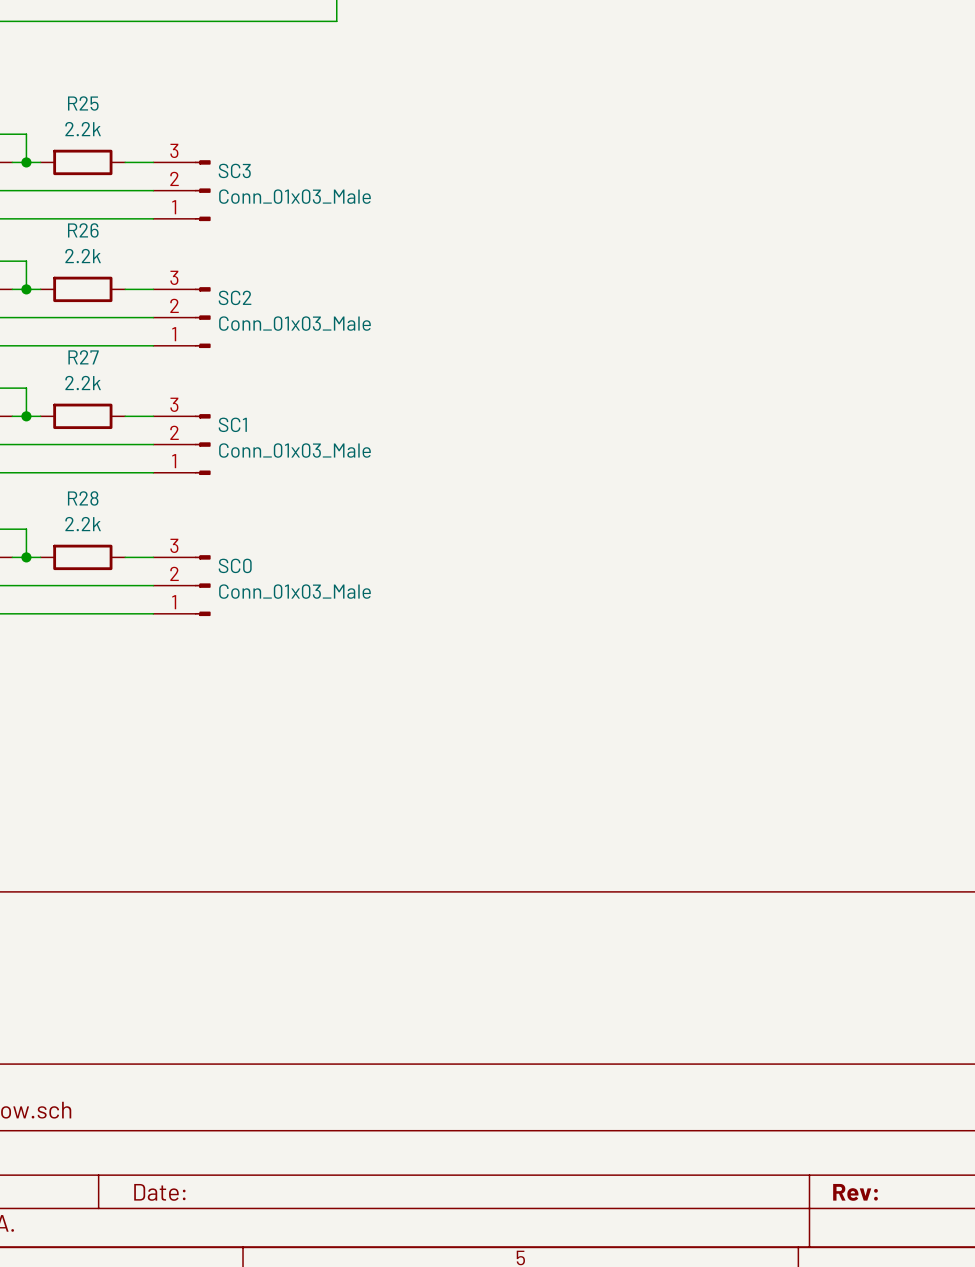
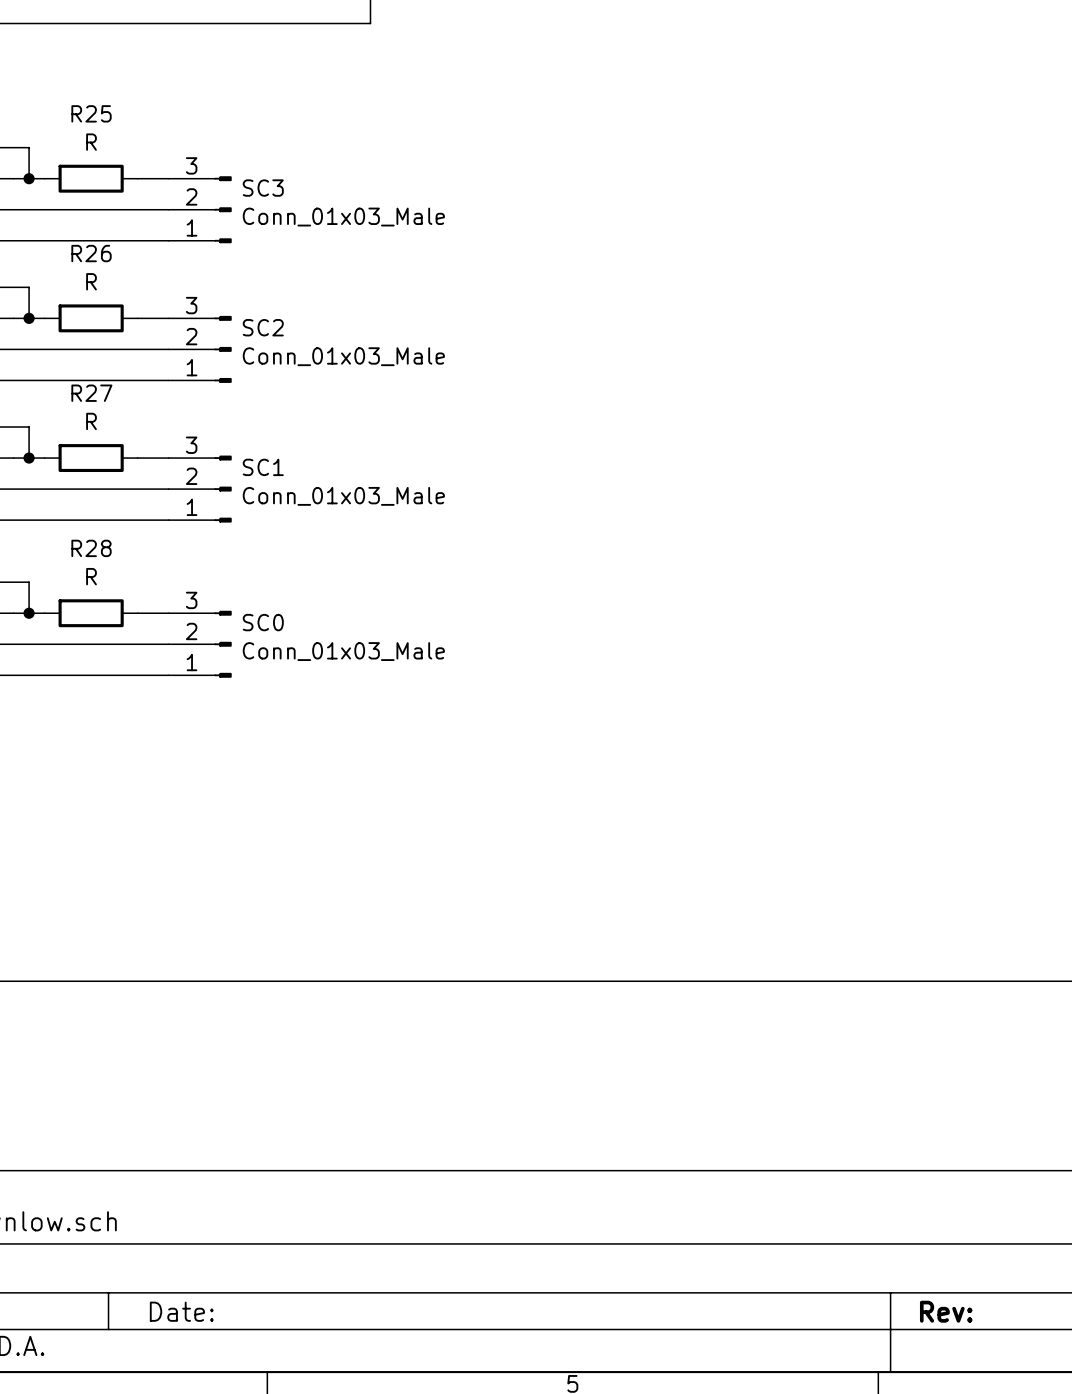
R25 value: 2.2k (83, 129) -> R (91, 142)
R26 value: 2.2k (83, 256) -> R (91, 281)
R27 value: 2.2k (83, 383) -> R (91, 421)
R28 value: 2.2k (83, 524) -> R (91, 576)

